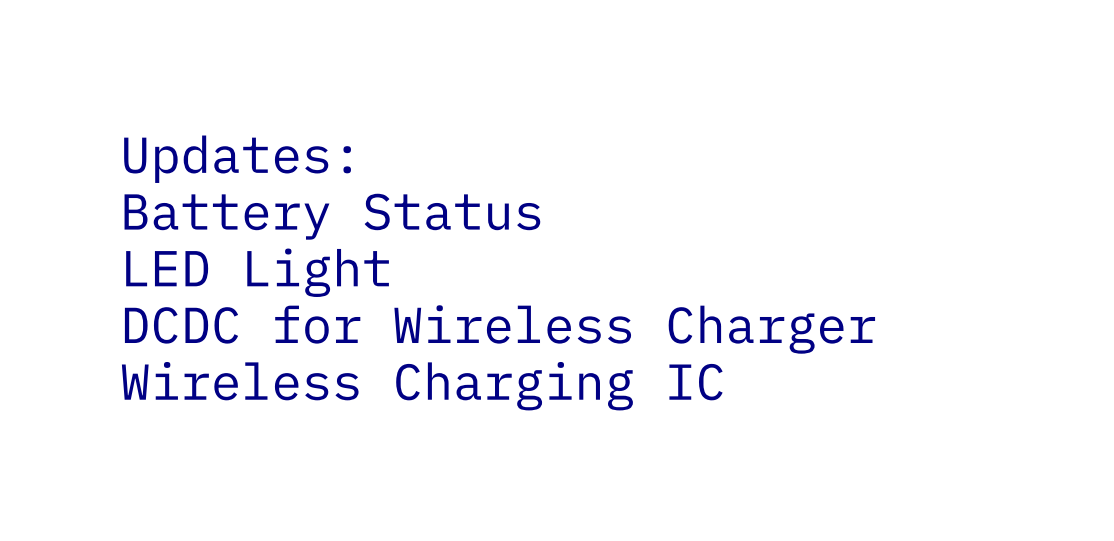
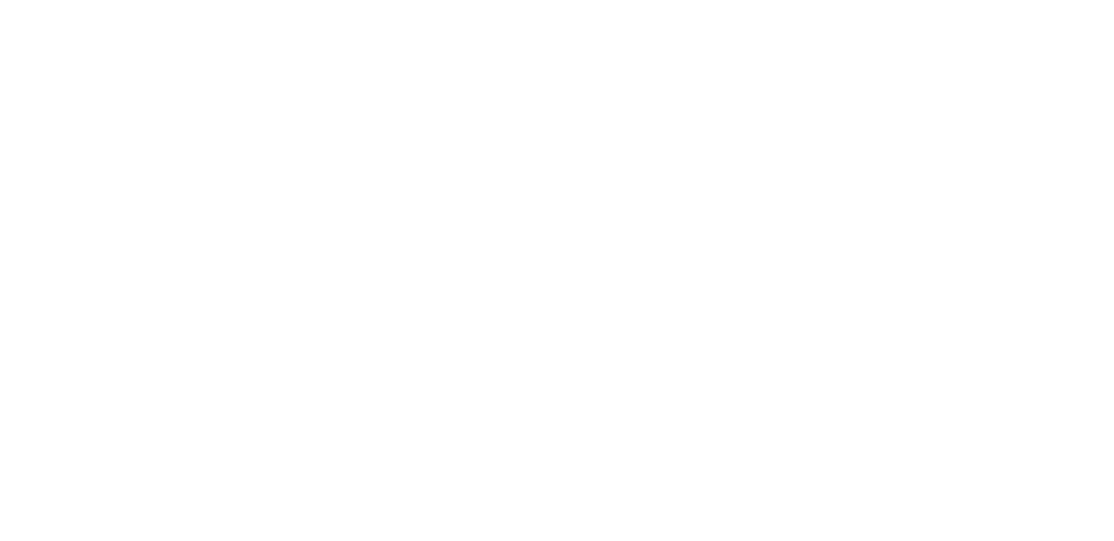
text: Updates: (237, 159) -> none
text: Battery Status (332, 216) -> none
text: LED Light (257, 272) -> none
text: DCDC for Wireless Charger (499, 329) -> none
text: Wireless Charging IC (422, 386) -> none

